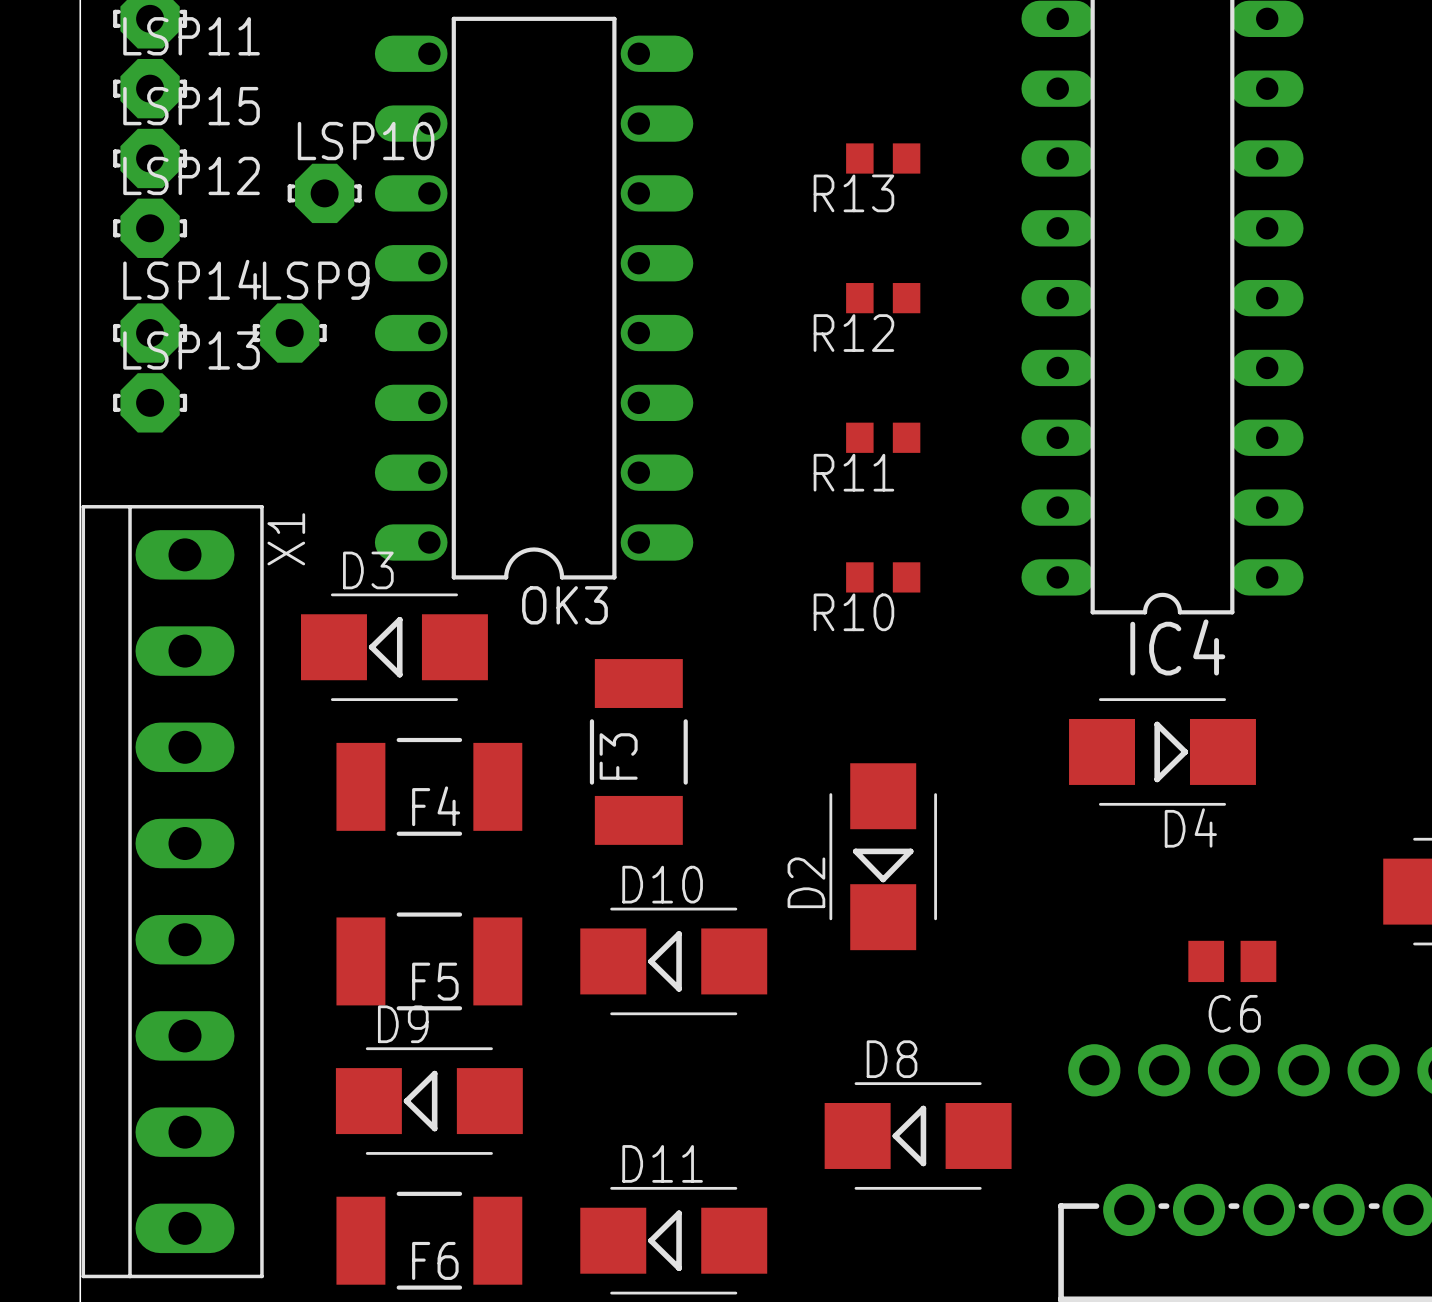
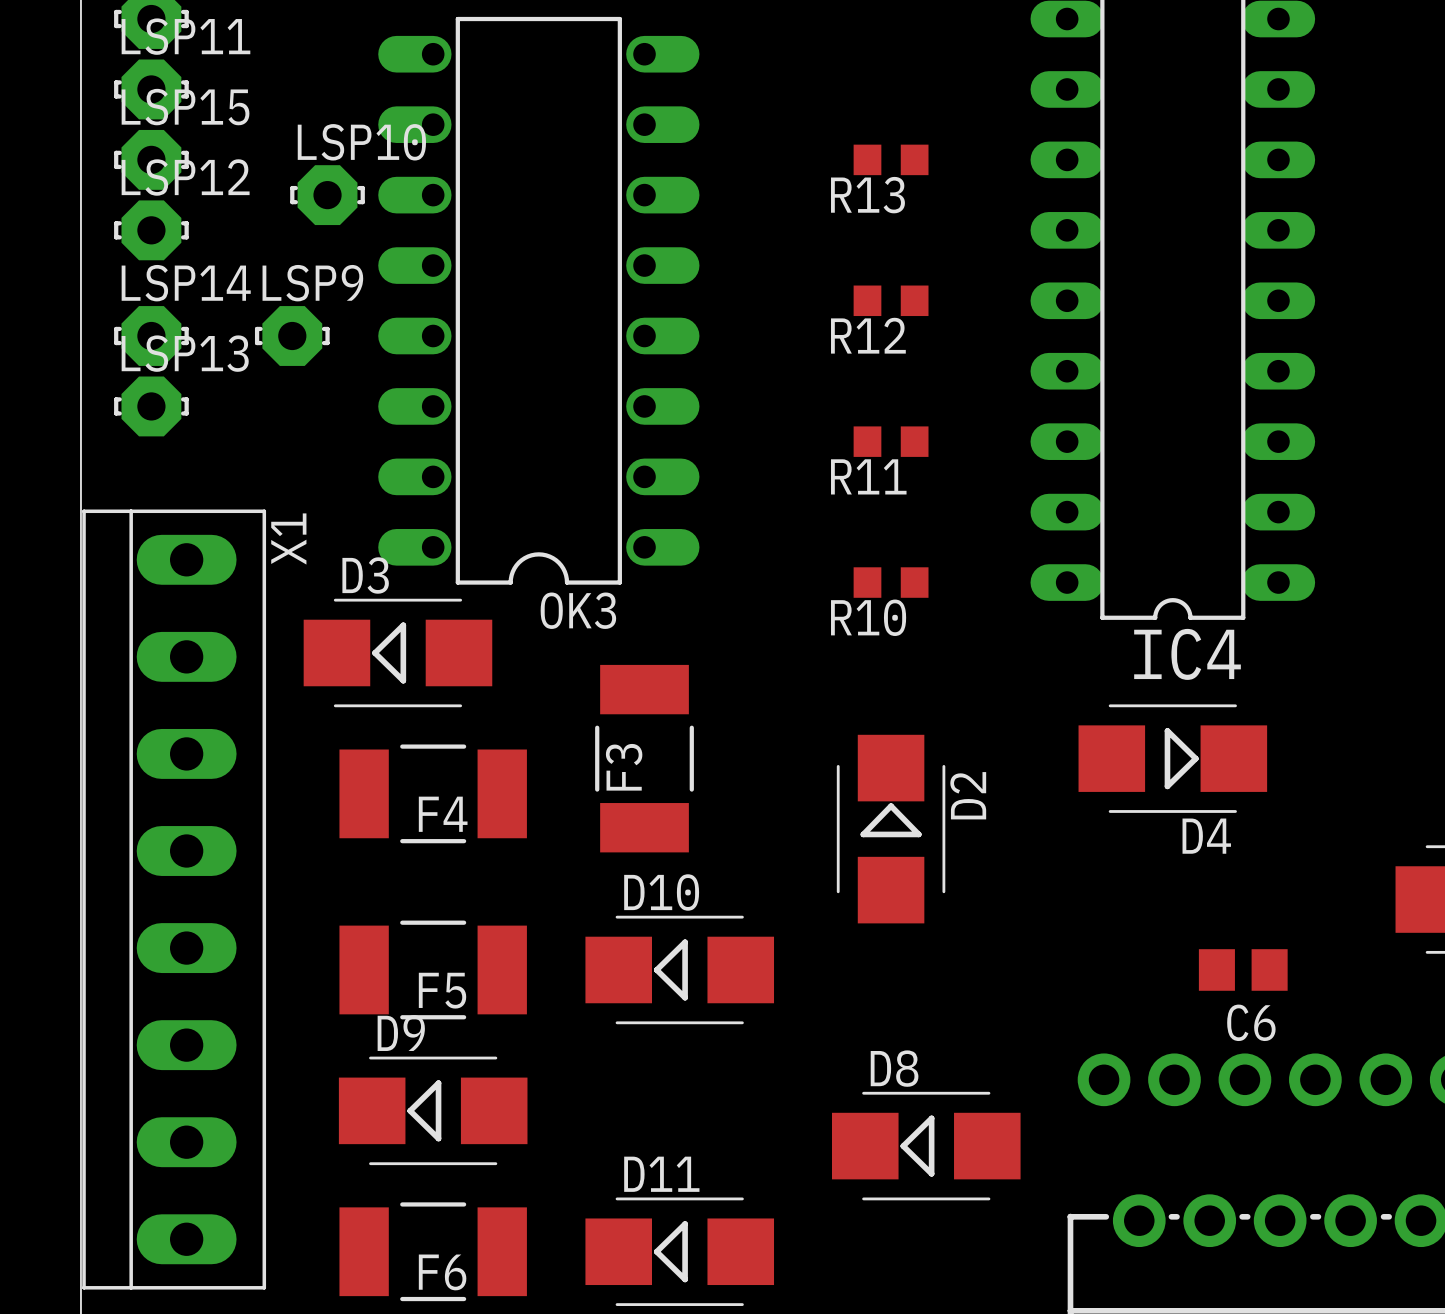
D2 rotation: 0° (883, 856) -> 180° (891, 829)

